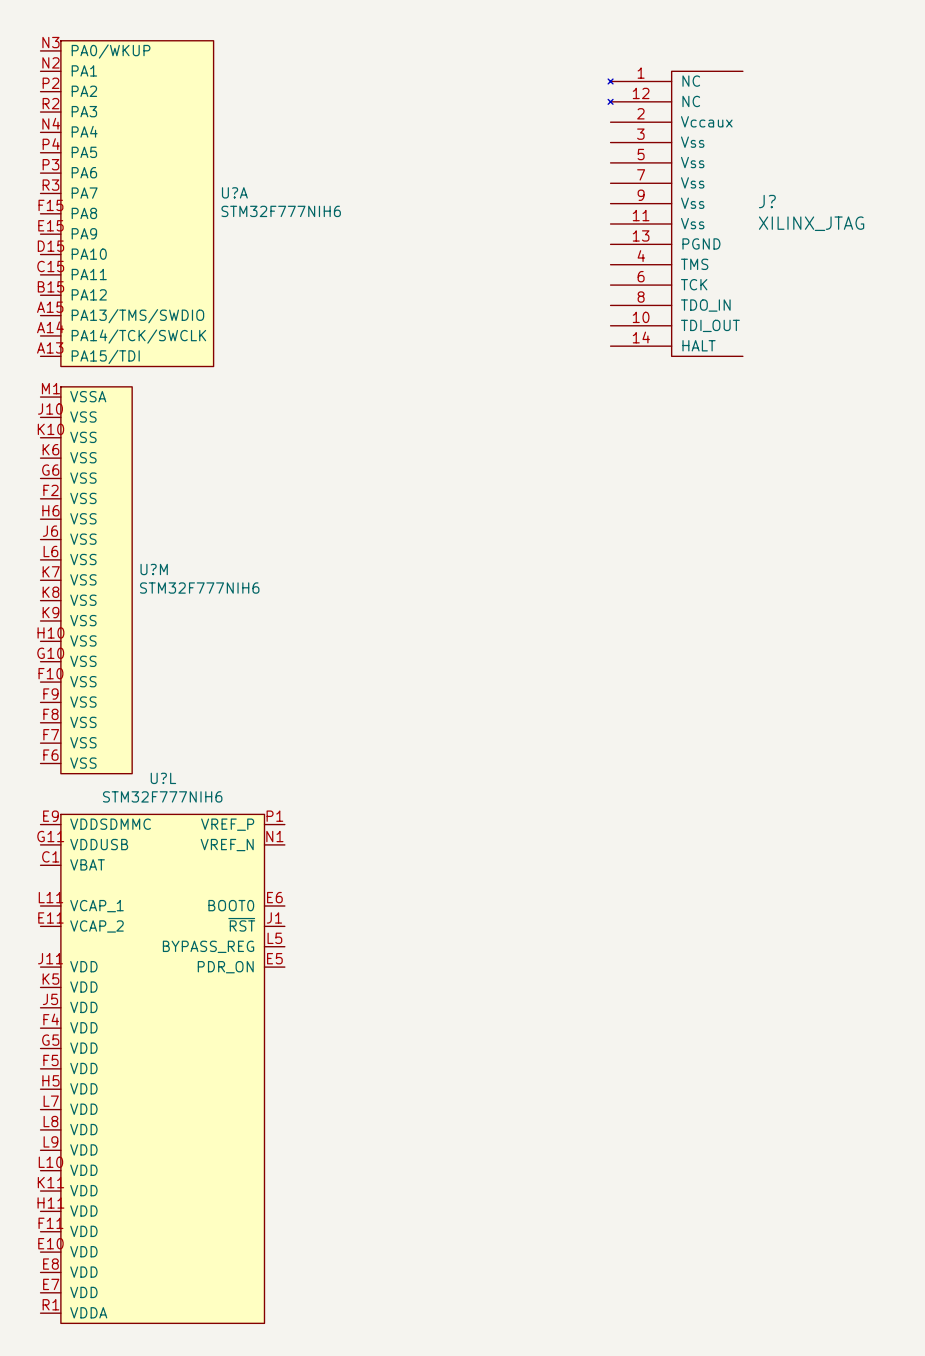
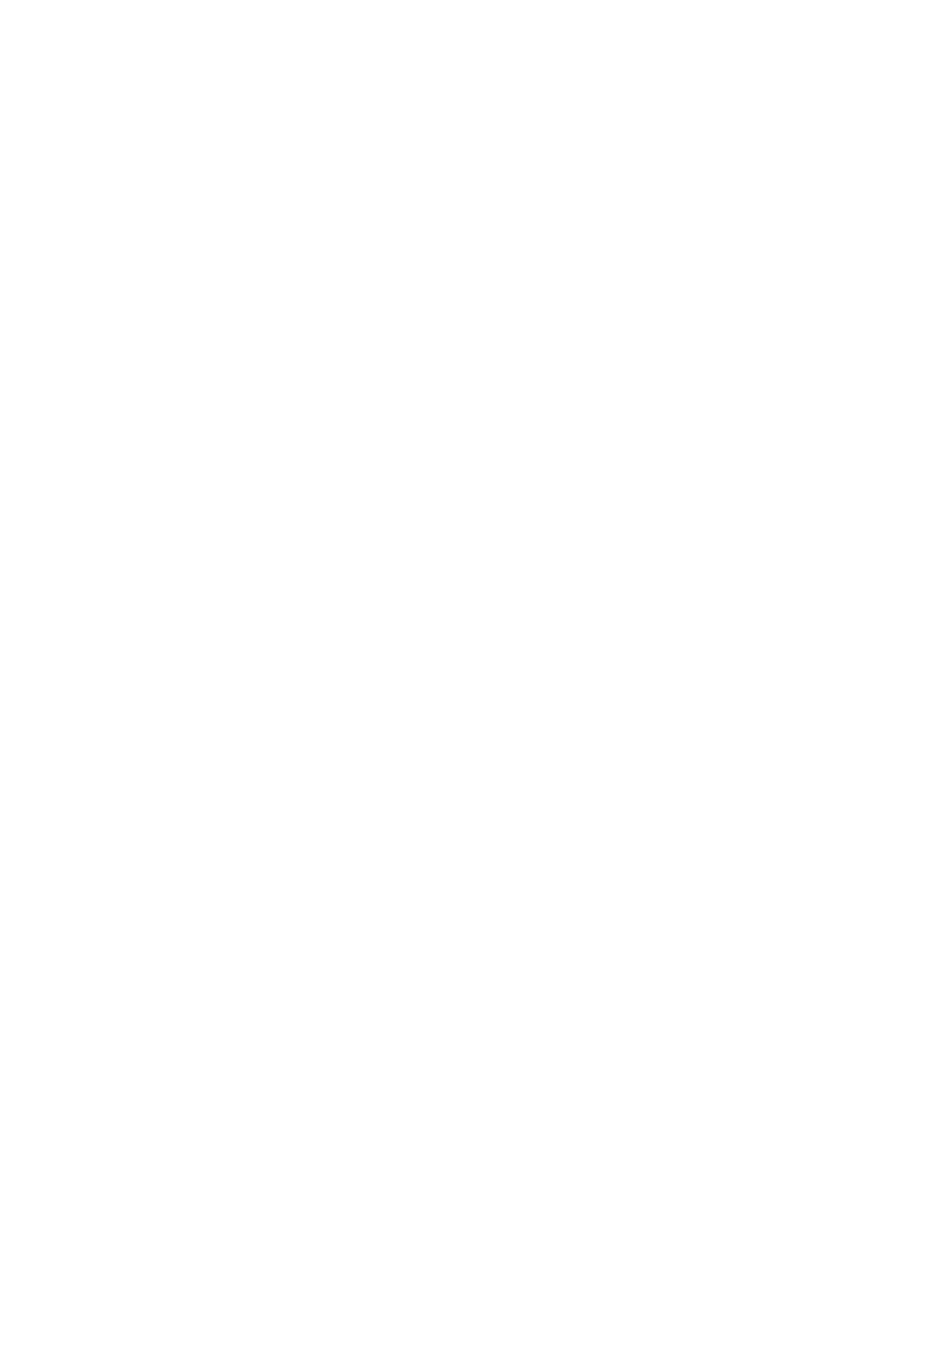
U?A: STM32F777NIH6 (127, 203) -> none
J?: XILINX_JTAG (675, 213) -> none
U?M: STM32F777NIH6 (86, 580) -> none
U?L: STM32F777NIH6 (162, 1068) -> none

